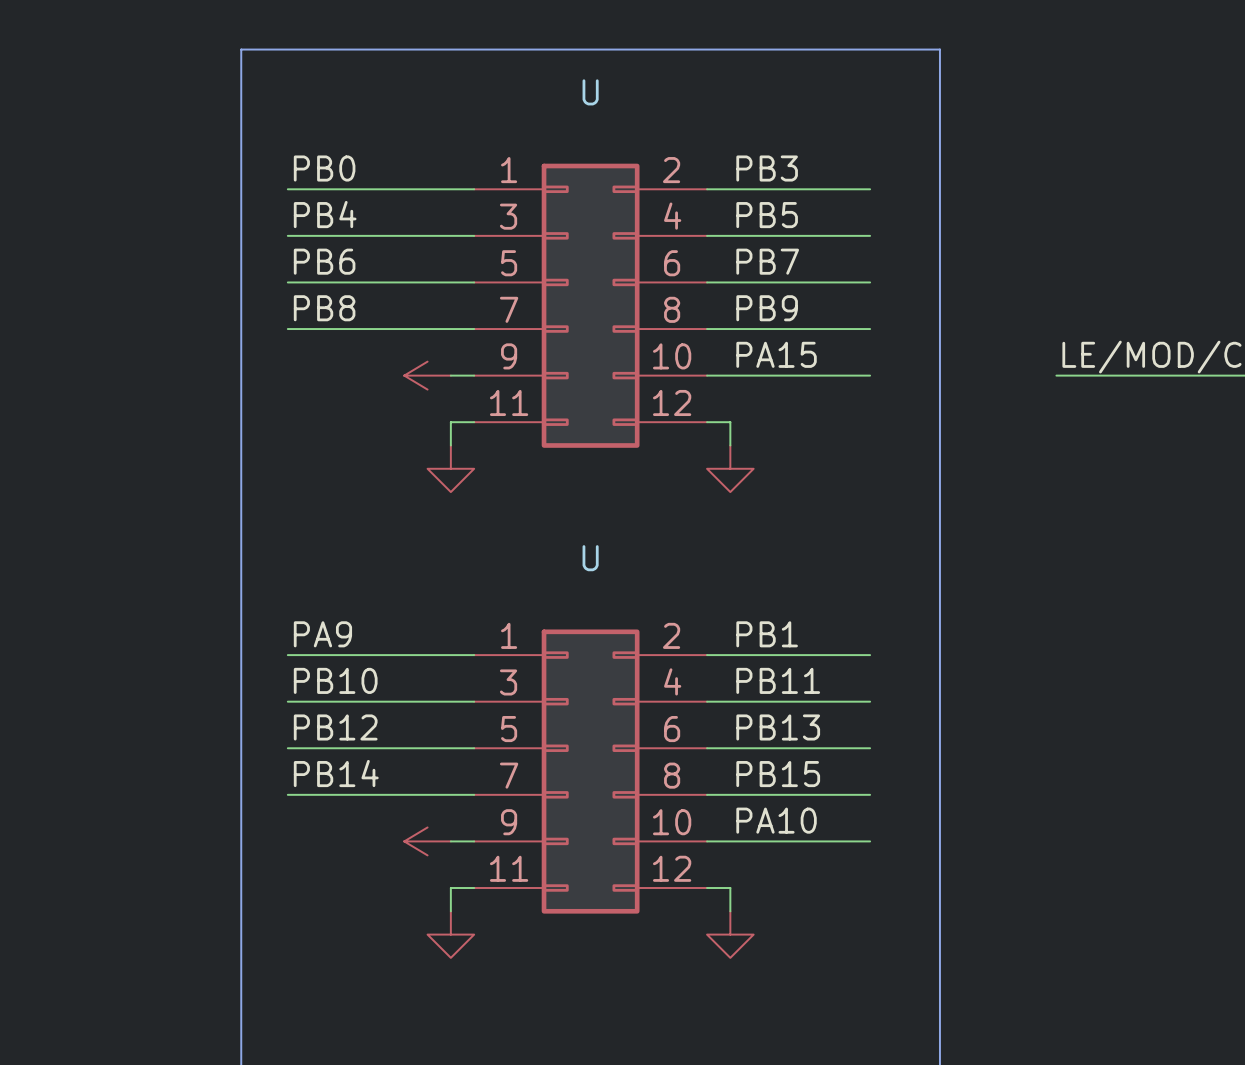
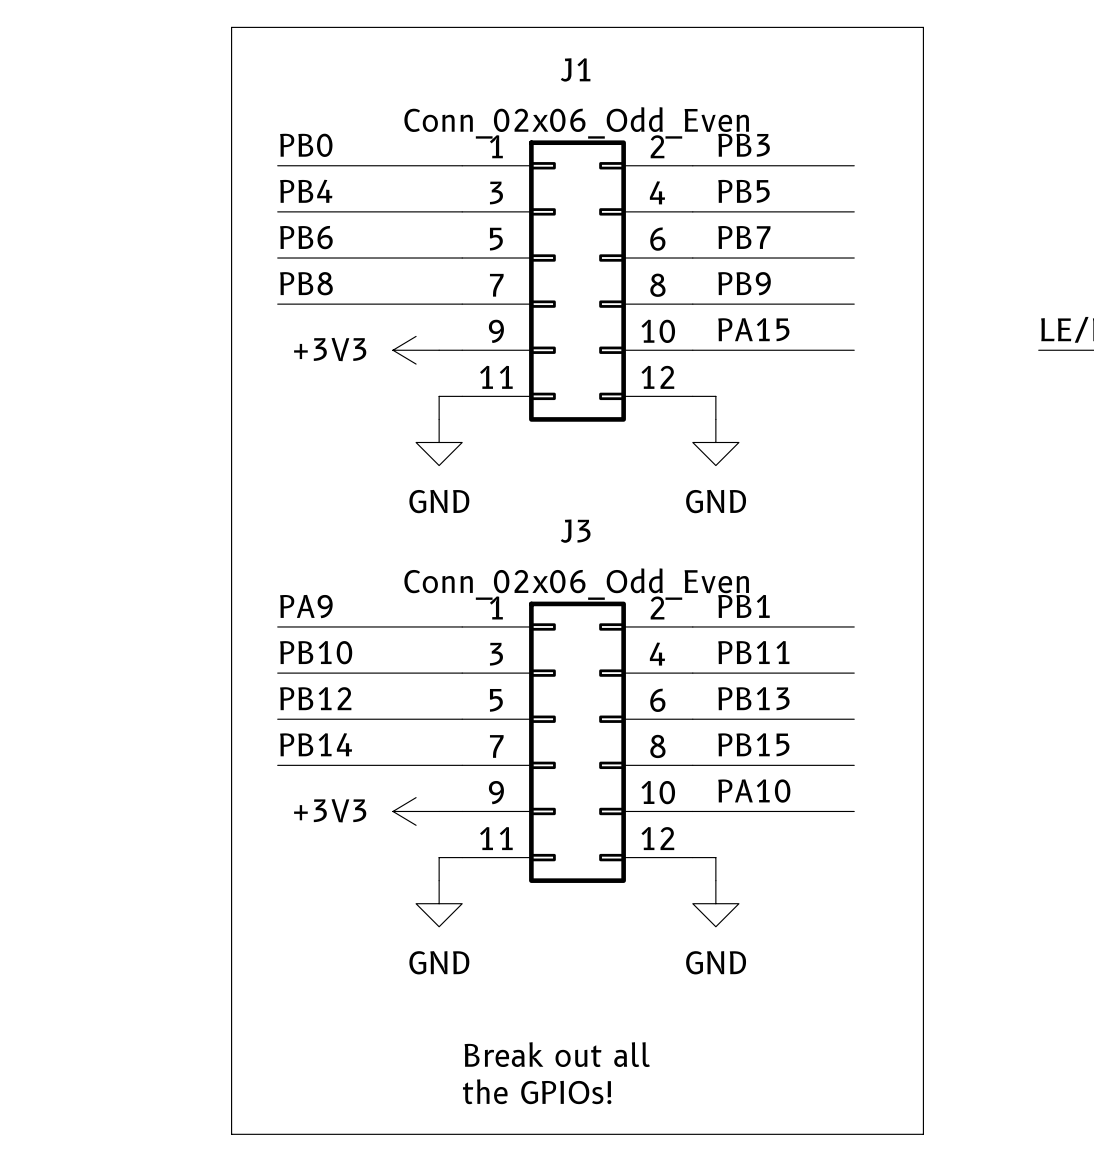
U name: U (590, 92) -> J1 (575, 69)
U value: none -> Conn_02x06_Odd_Even (576, 122)
power symbol text: none -> +3V3 (330, 349)
power symbol text: none -> GND (439, 501)
power symbol text: none -> GND (716, 501)
U name: U (590, 558) -> J3 (575, 531)
U value: none -> Conn_02x06_Odd_Even (576, 584)
power symbol text: none -> +3V3 (330, 810)
power symbol text: none -> GND (439, 962)
power symbol text: none -> GND (716, 962)

